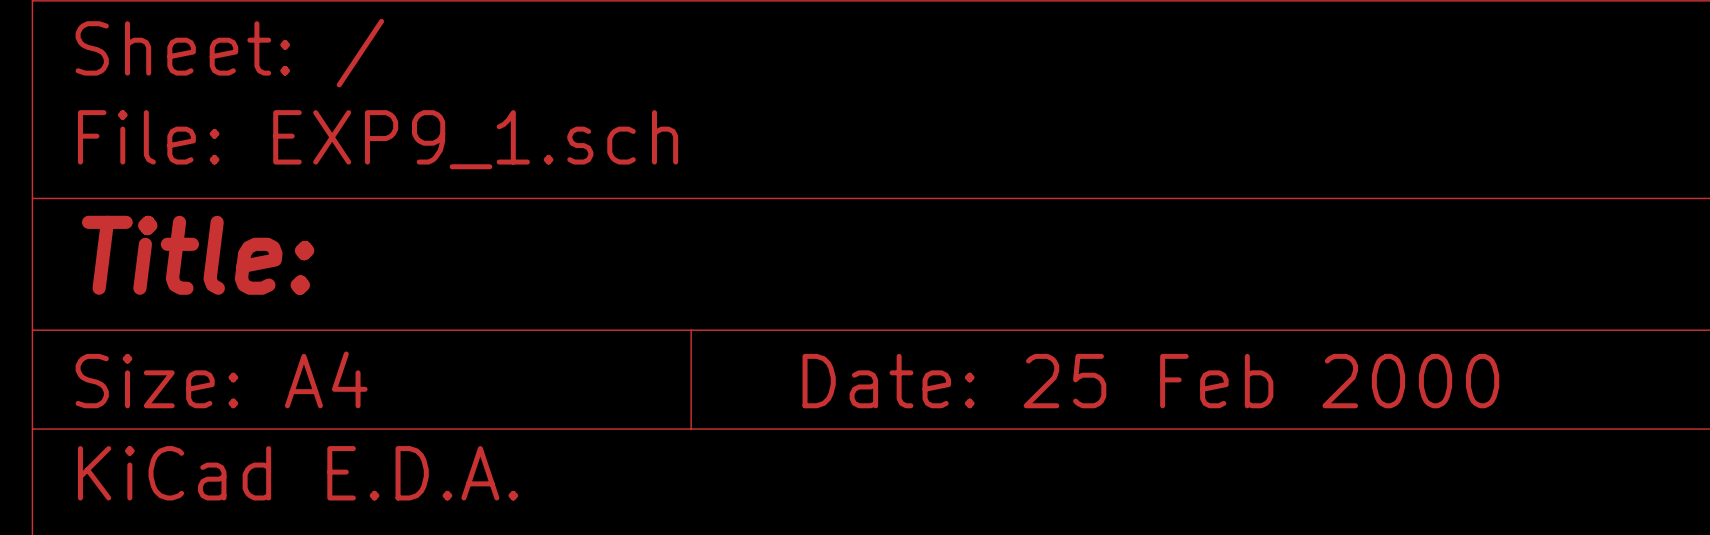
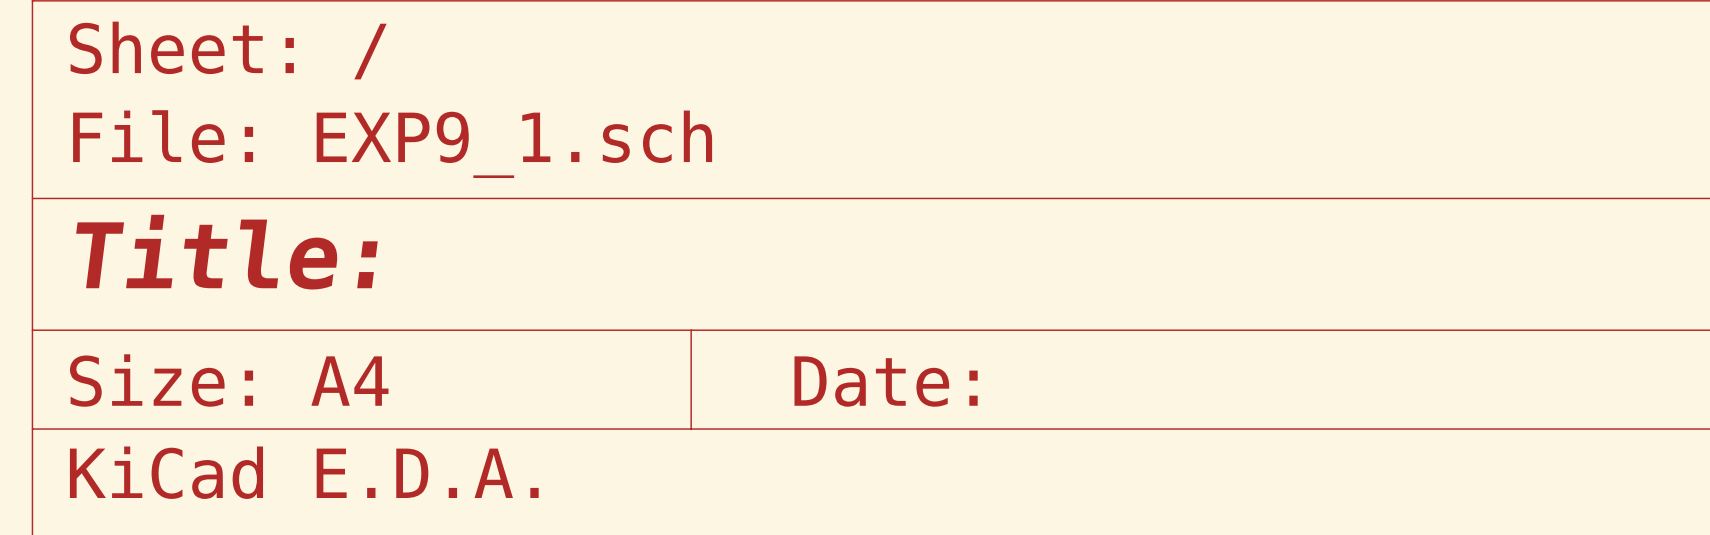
title block: Date: 25 Feb 2000 (1150, 381) -> Date: (886, 381)

